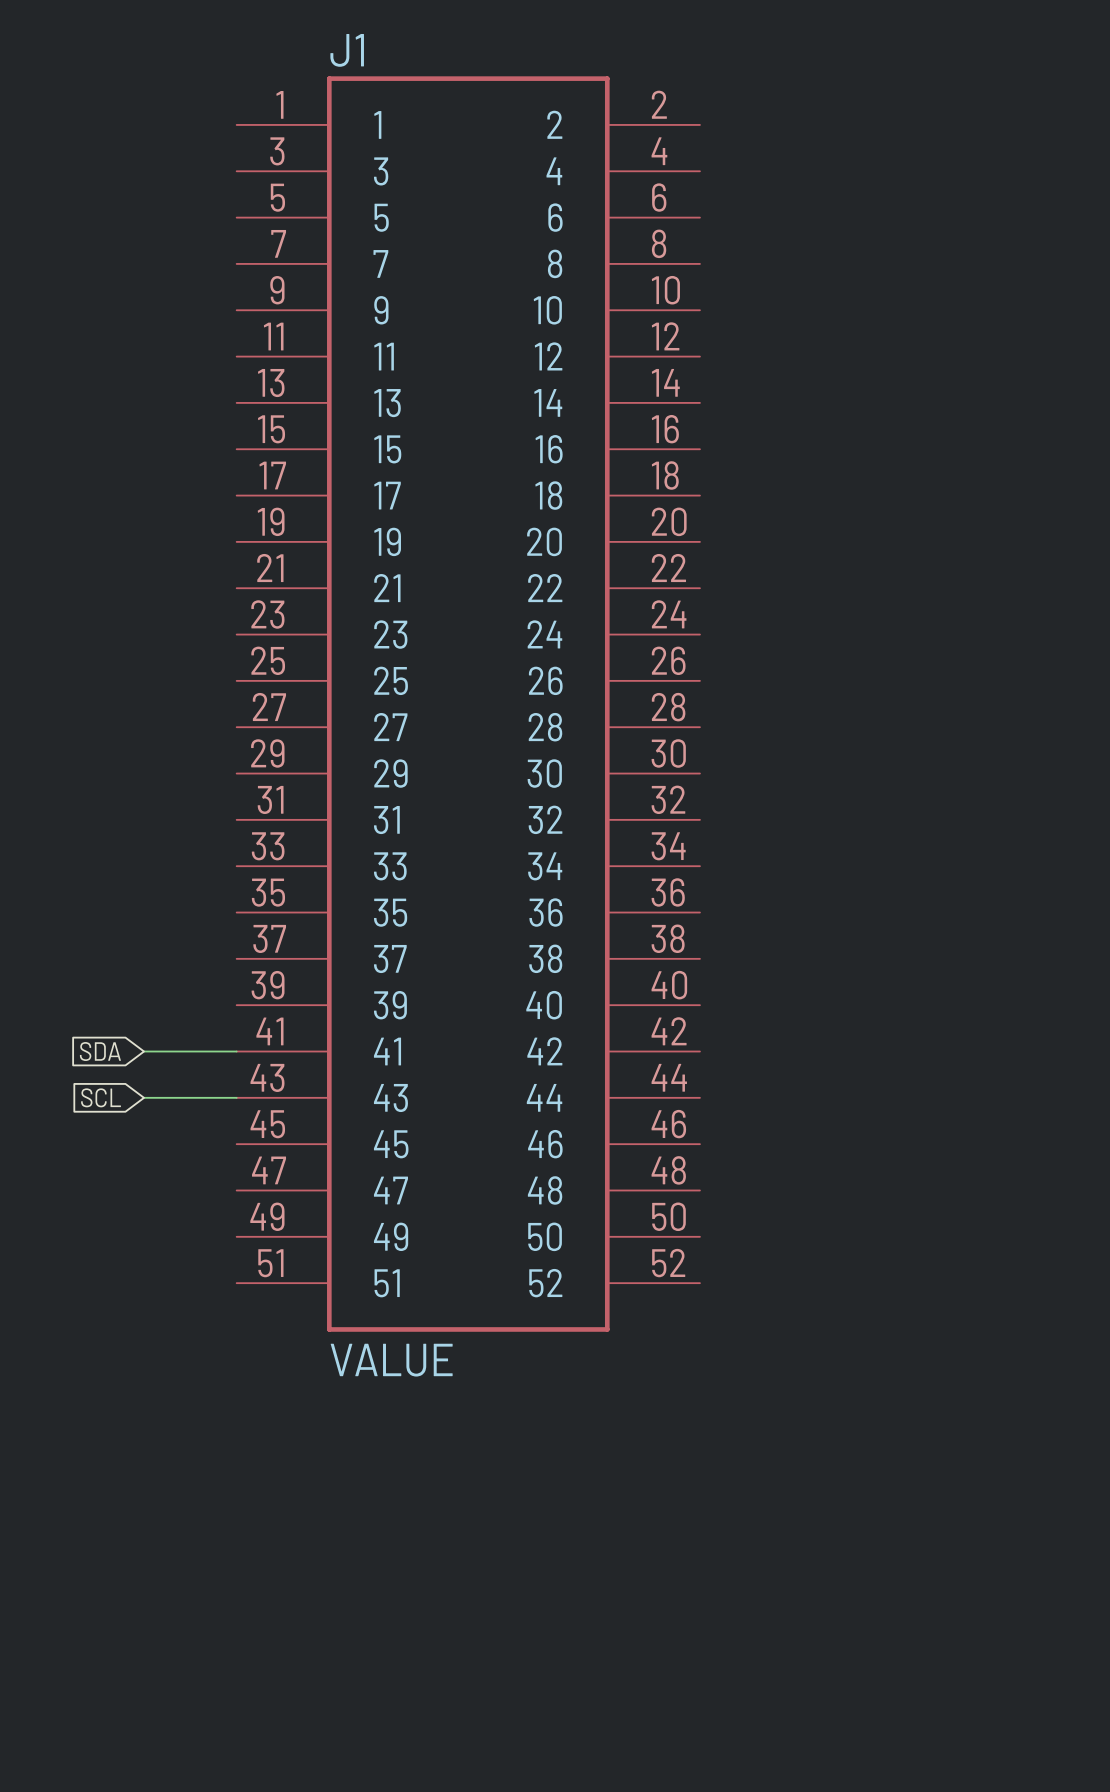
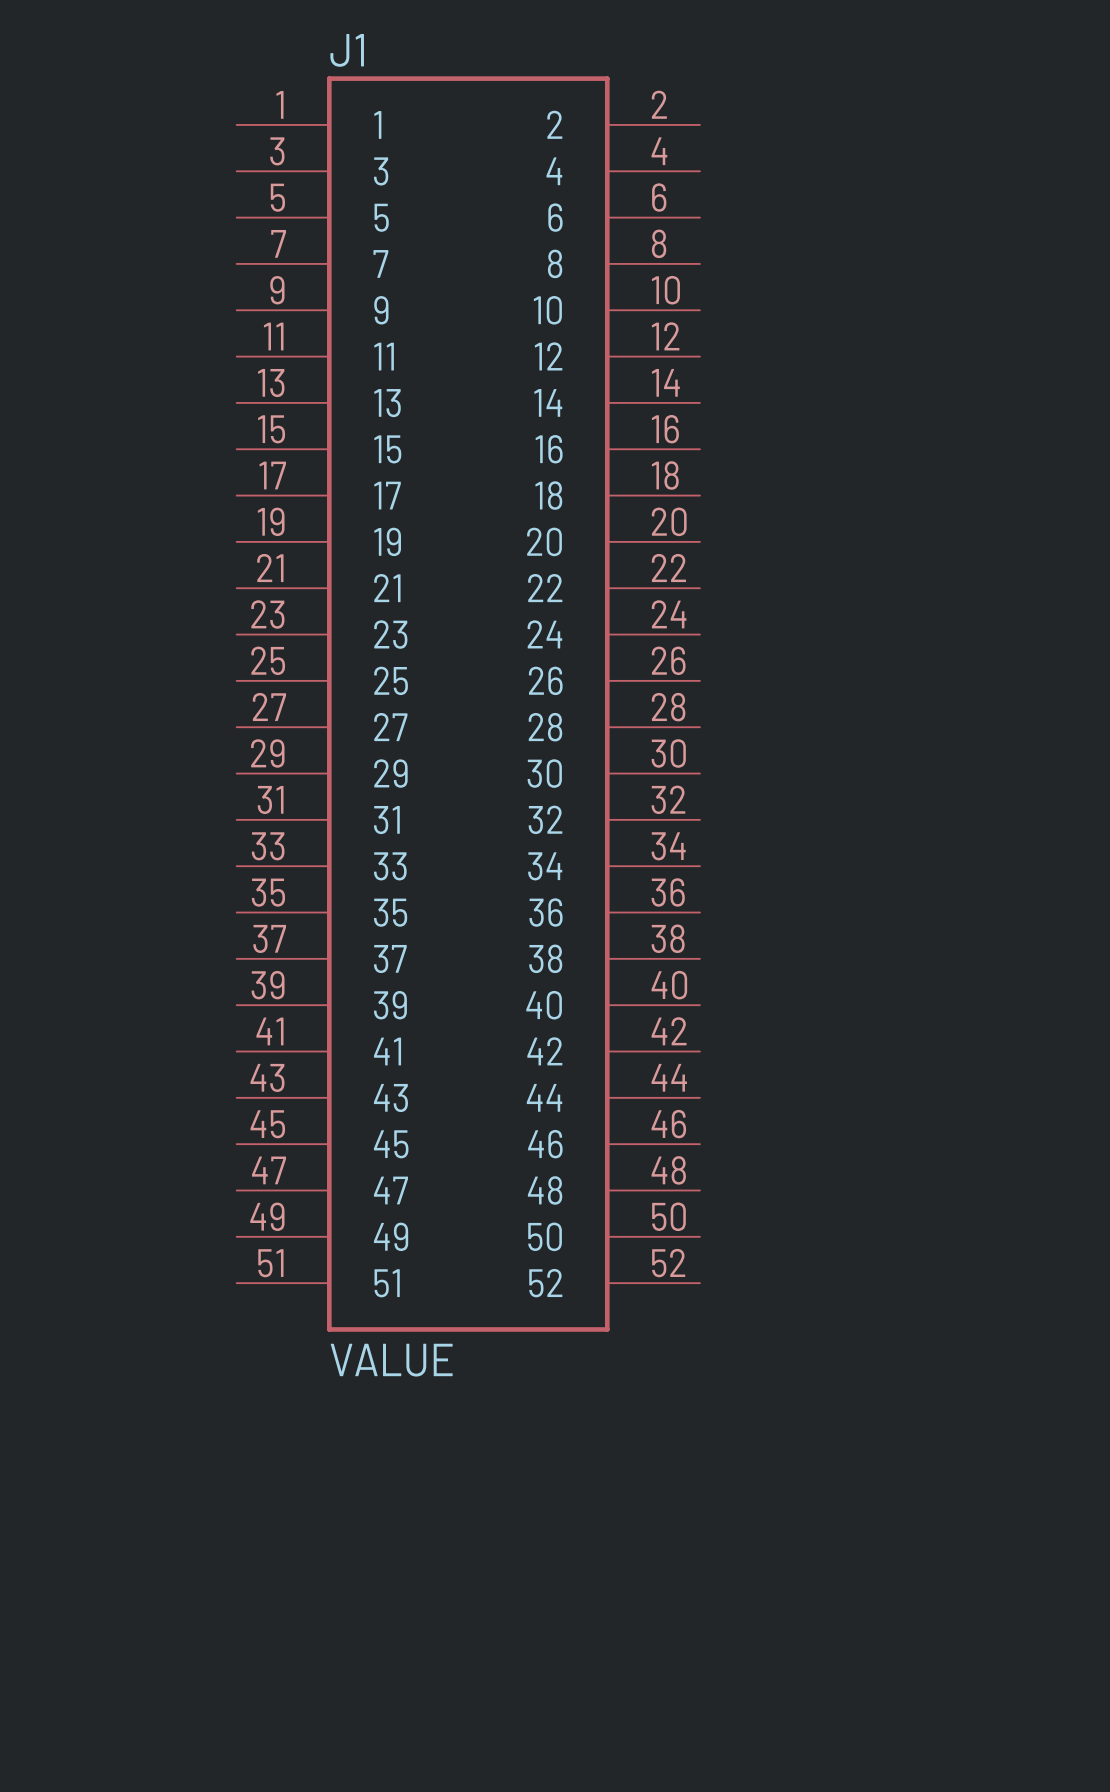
global label: SDA (100, 1051) -> none
wire: (144, 1051) (236, 1051) -> none
global label: SCL (101, 1097) -> none
wire: (144, 1097) (236, 1097) -> none

